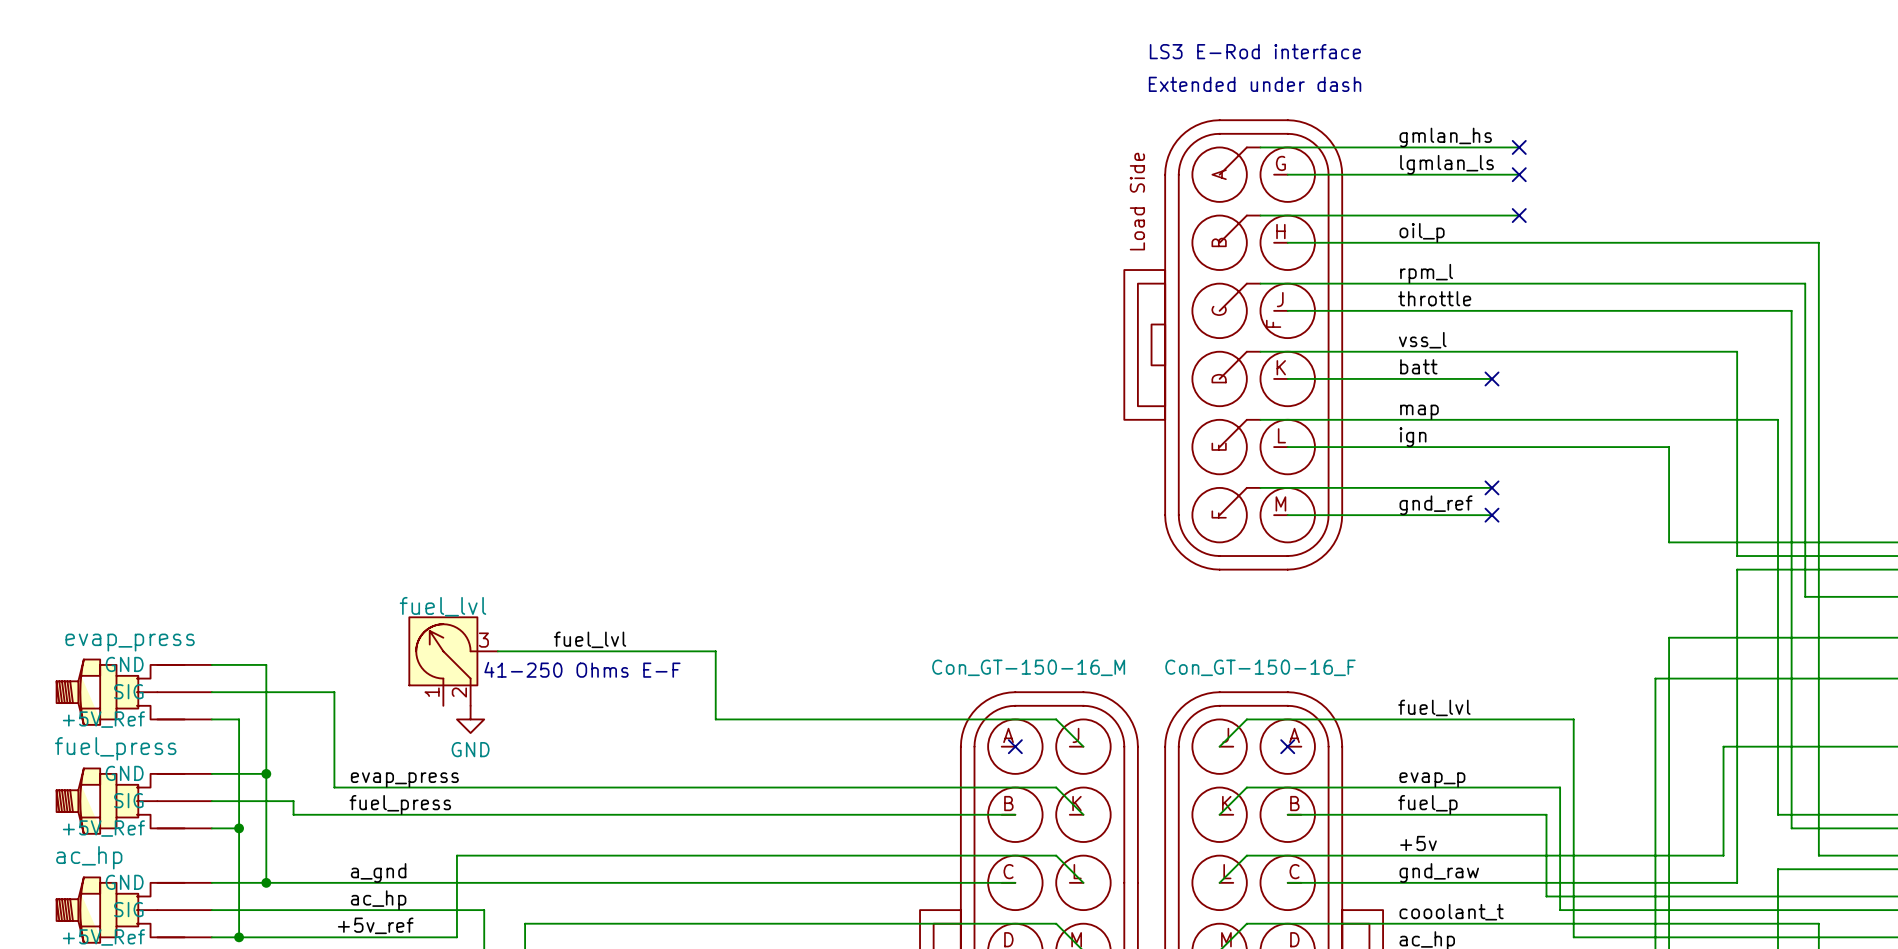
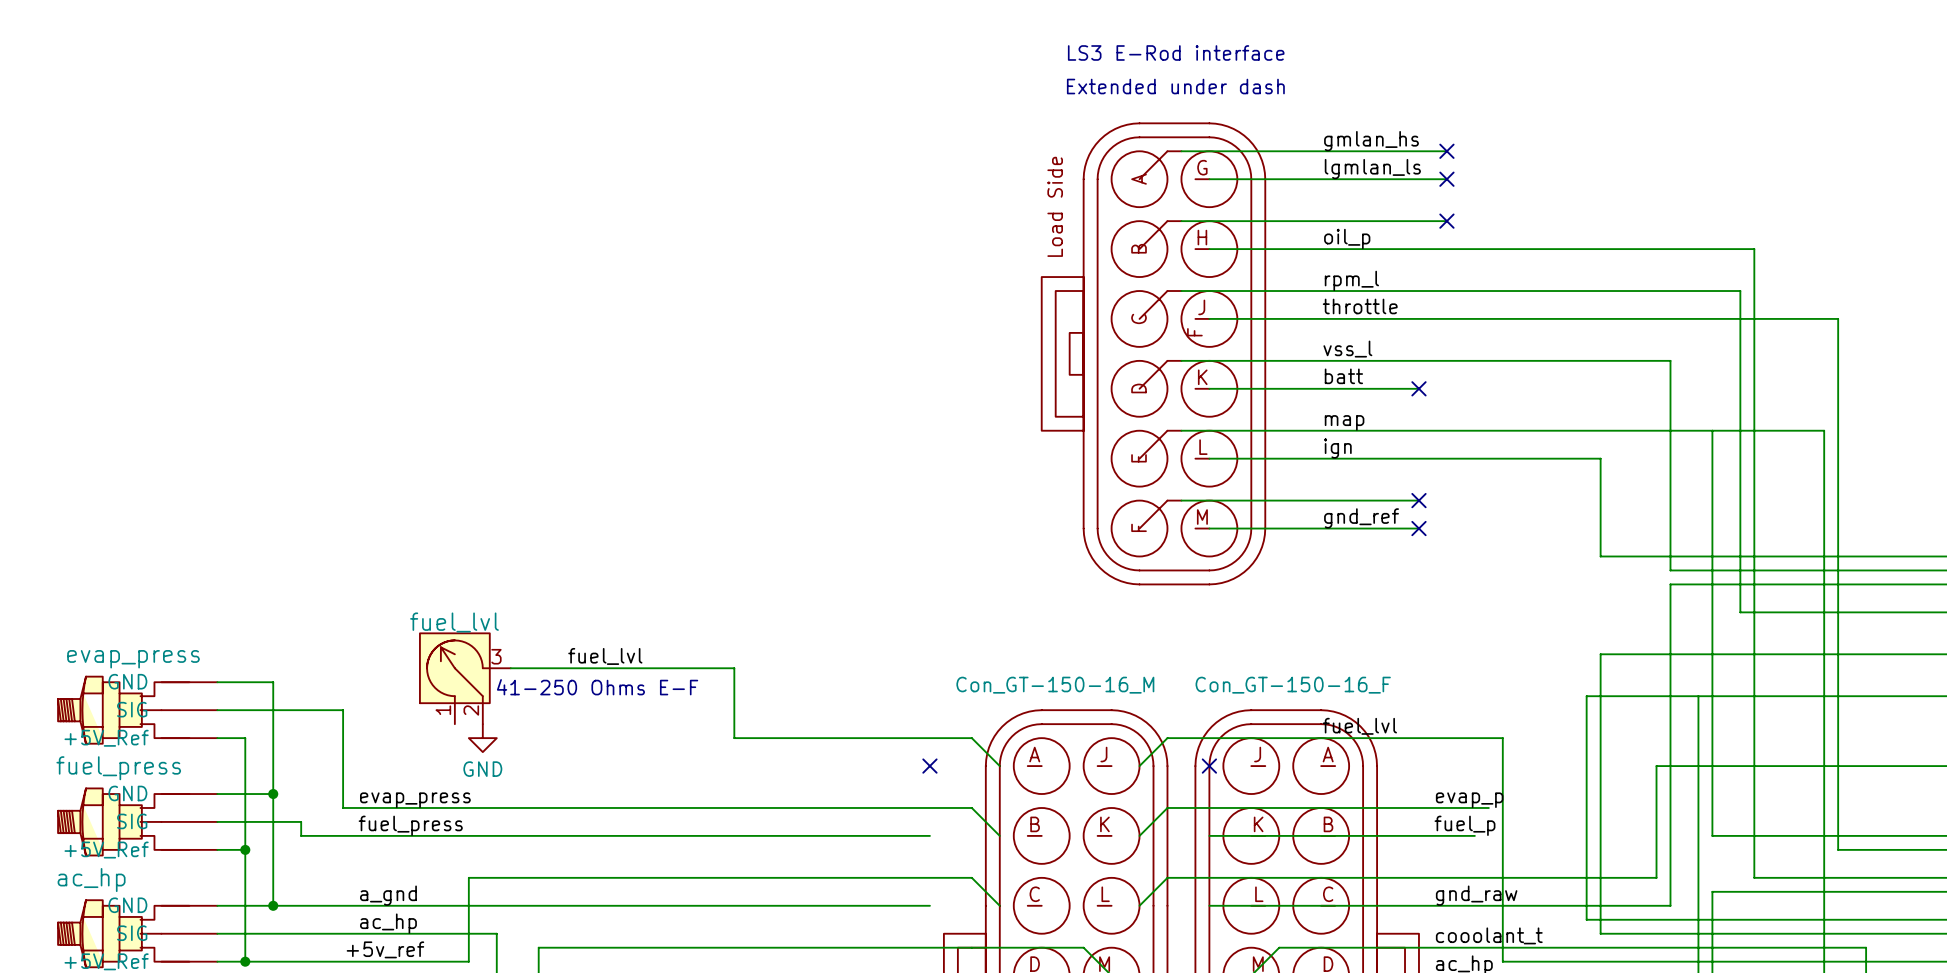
text position: LS3 E-Rod interface (1255, 51) -> LS3 E-Rod interface (1176, 52)
text position: Extended under dash (1255, 84) -> Extended under dash (1175, 86)
label position: gmlan_hs (1445, 137) -> gmlan_hs (1371, 141)
wire: (1410, 147) (1519, 147) -> (1181, 151) (1293, 151)
no-connect mark: none -> (1446, 151)
no-connect mark: (1519, 147) -> none
label position: lgmlan_ls (1447, 164) -> lgmlan_ls (1372, 169)
wire: (1410, 174) (1519, 174) -> (1209, 179) (1321, 179)
no-connect mark: none -> (1446, 179)
no-connect mark: (1519, 174) -> none
wire: (1410, 215) (1519, 215) -> (1181, 221) (1293, 221)
no-connect mark: none -> (1446, 221)
no-connect mark: (1519, 215) -> none
label position: oil_p (1422, 232) -> oil_p (1347, 238)
wire: none -> (1209, 249) (1321, 249)
wire: (1709, 242) (1818, 242) (1818, 855) -> (1754, 249) (1754, 877)
label position: rpm_l (1426, 273) -> rpm_l (1351, 280)
wire: none -> (1181, 291) (1293, 291)
wire: (1696, 283) (1805, 283) (1805, 596) -> (1740, 291) (1740, 612) (1852, 612)
label position: throttle (1434, 298) -> throttle (1360, 306)
wire: none -> (1209, 318) (1321, 318)
label position: vss_l (1422, 340) -> vss_l (1347, 349)
part position: (1233, 344) -> (1153, 353)
wire: none -> (1181, 360) (1293, 360)
wire: (1628, 351) (1737, 351) (1737, 556) -> (1670, 360) (1670, 570) (1782, 570)
label position: batt (1418, 366) -> batt (1343, 376)
wire: (1383, 378) (1492, 378) -> (1209, 388) (1321, 388)
no-connect mark: none -> (1418, 388)
no-connect mark: (1492, 378) -> none
label position: map (1419, 412) -> map (1344, 422)
wire: none -> (1181, 430) (1293, 430)
label position: ign (1412, 437) -> ign (1337, 448)
wire: none -> (1209, 458) (1321, 458)
wire: (1560, 447) (1669, 447) -> (1712, 430) (1712, 458)
wire: (1383, 487) (1492, 487) -> (1181, 500) (1293, 500)
no-connect mark: none -> (1418, 500)
no-connect mark: (1492, 487) -> none
label position: gnd_ref (1436, 505) -> gnd_ref (1361, 518)
wire: (1383, 515) (1492, 515) -> (1209, 528) (1321, 528)
no-connect mark: none -> (1418, 528)
no-connect mark: (1492, 515) -> none
wire: (1737, 569) (1737, 882) (1628, 882) -> (1782, 584) (1670, 584) (1670, 905)
label position: fuel_lvl (1434, 707) -> fuel_lvl (1359, 726)
wire: (947, 719) (1056, 719) (1083, 746) -> (971, 738) (999, 766)
wire: (1246, 719) (1219, 746) -> (1279, 738) (1167, 738) (1139, 766)
wire: (1464, 719) (1573, 719) (1573, 937) -> (1502, 738) (1502, 961) (1614, 961)
no-connect mark: none -> (929, 766)
no-connect mark: (1015, 746) -> none
no-connect mark: none -> (1209, 766)
no-connect mark: (1287, 746) -> none
wire: (1723, 746) (1723, 855) -> (1768, 766) (1656, 766) (1656, 877)
wire: (947, 787) (1056, 787) (1083, 814) -> (971, 807) (999, 835)
wire: (1246, 787) (1219, 814) -> (1279, 807) (1167, 807) (1139, 835)
wire: (1451, 787) (1560, 787) -> (1600, 458) (1600, 556) (1712, 556) (1712, 654) (1600, 654) (1600, 807)
wire: (906, 814) (1015, 814) -> none
wire: none -> (1209, 835) (1321, 835)
wire: (1437, 814) (1546, 814) -> (1698, 696) (1586, 696) (1586, 835)
wire: (1669, 814) (1669, 869) -> (1712, 835) (1824, 835) (1824, 891) (1712, 891)
label: +5v (1418, 843) -> none
wire: (947, 855) (1056, 855) (1083, 882) -> (971, 877) (999, 905)
wire: (1246, 855) (1219, 882) -> (1279, 877) (1167, 877) (1139, 905)
wire: (1614, 855) (1709, 855) -> (1768, 877) (1866, 877)
wire: (906, 882) (1015, 882) -> none
wire: none -> (1209, 905) (1321, 905)

